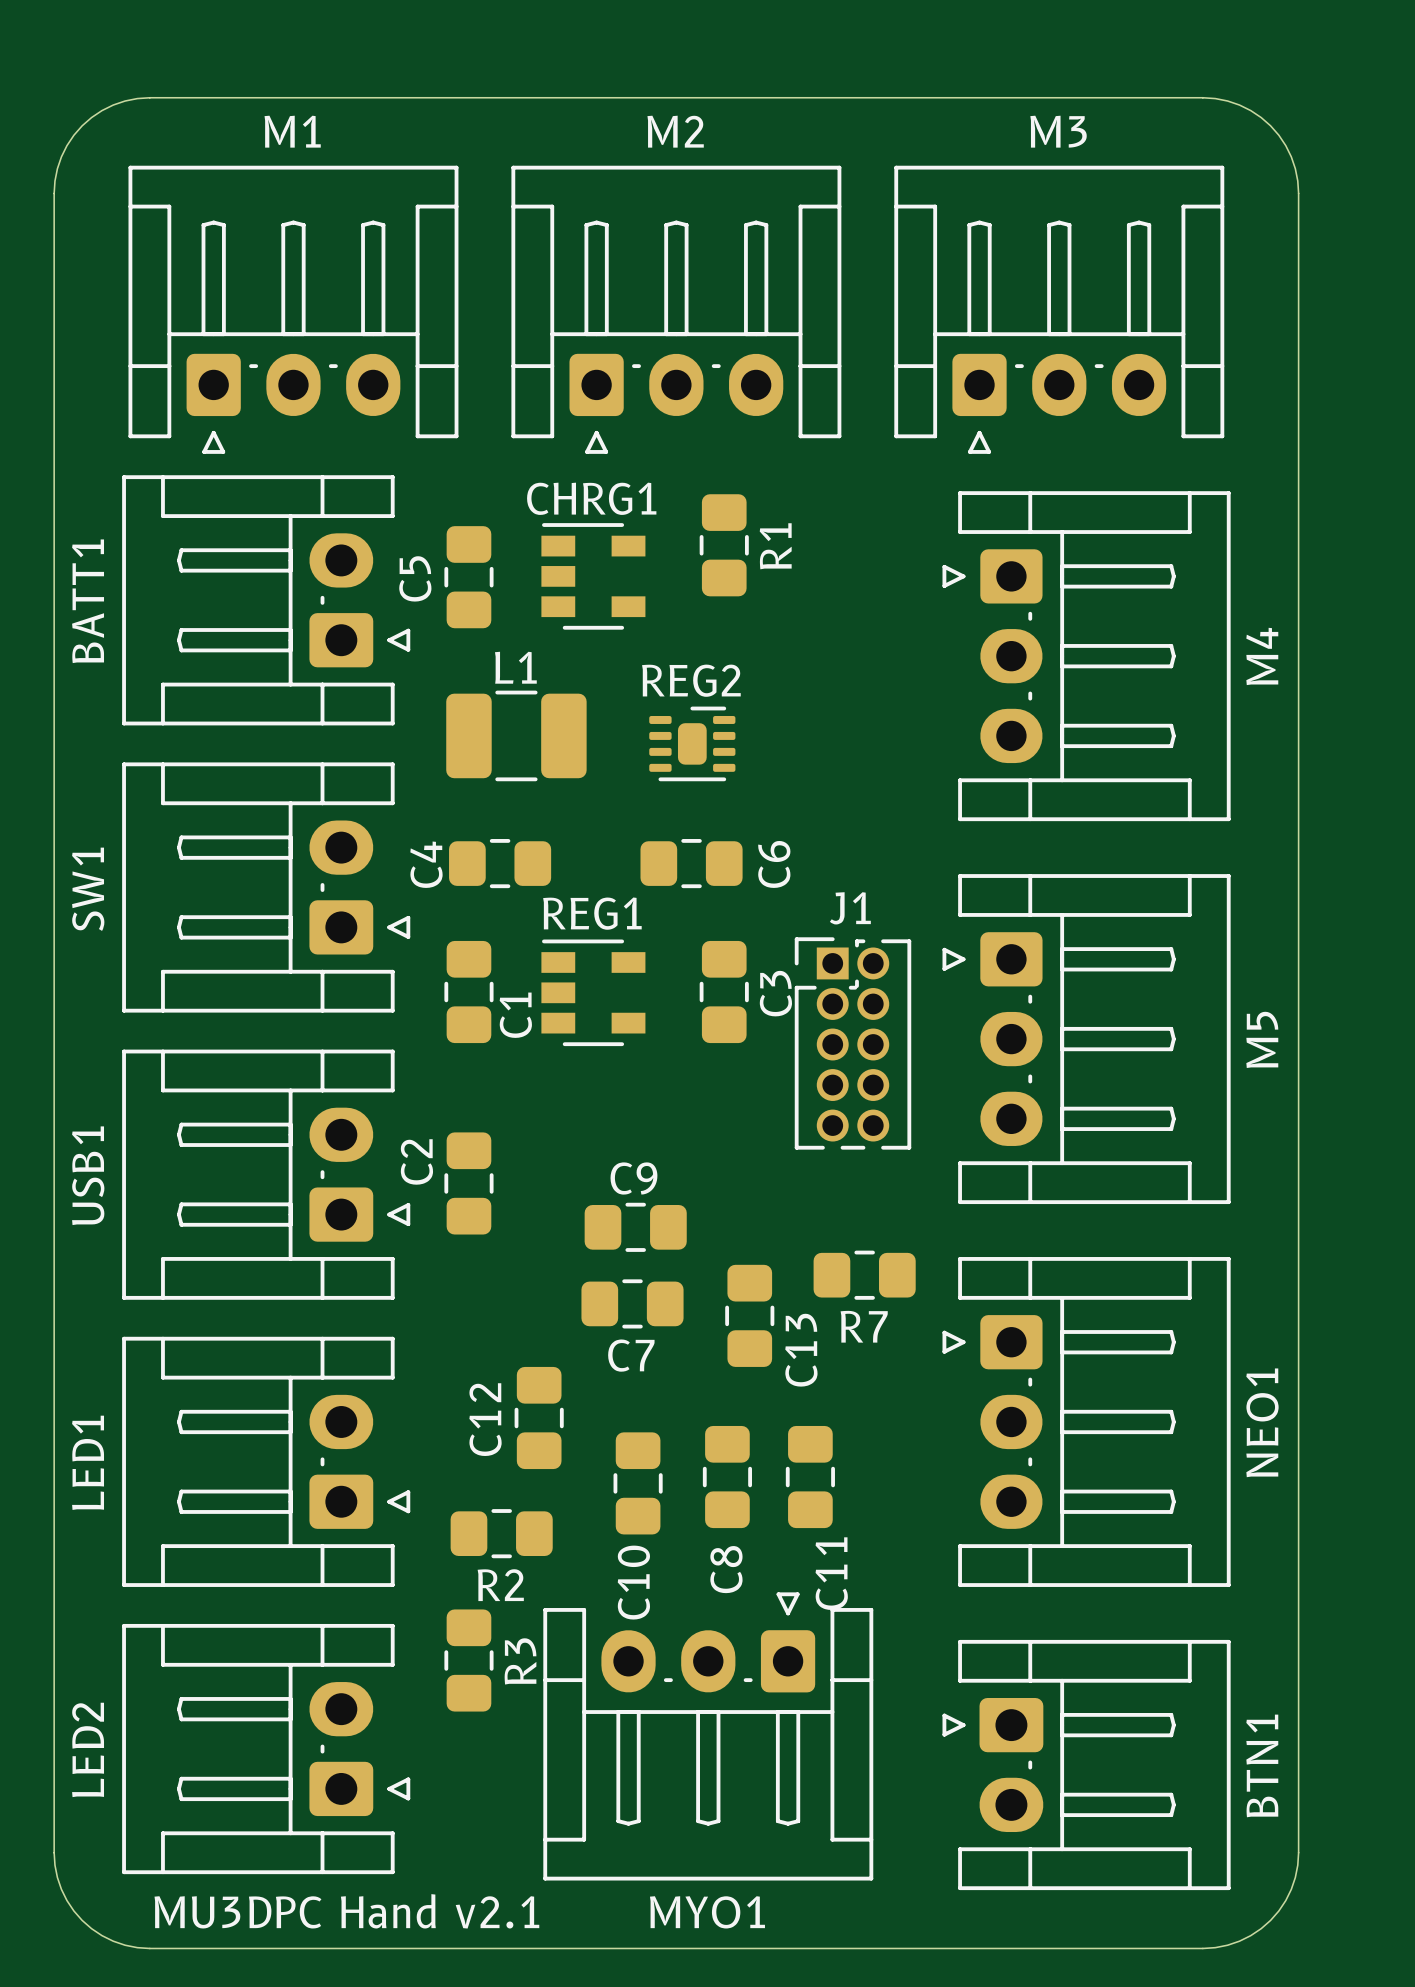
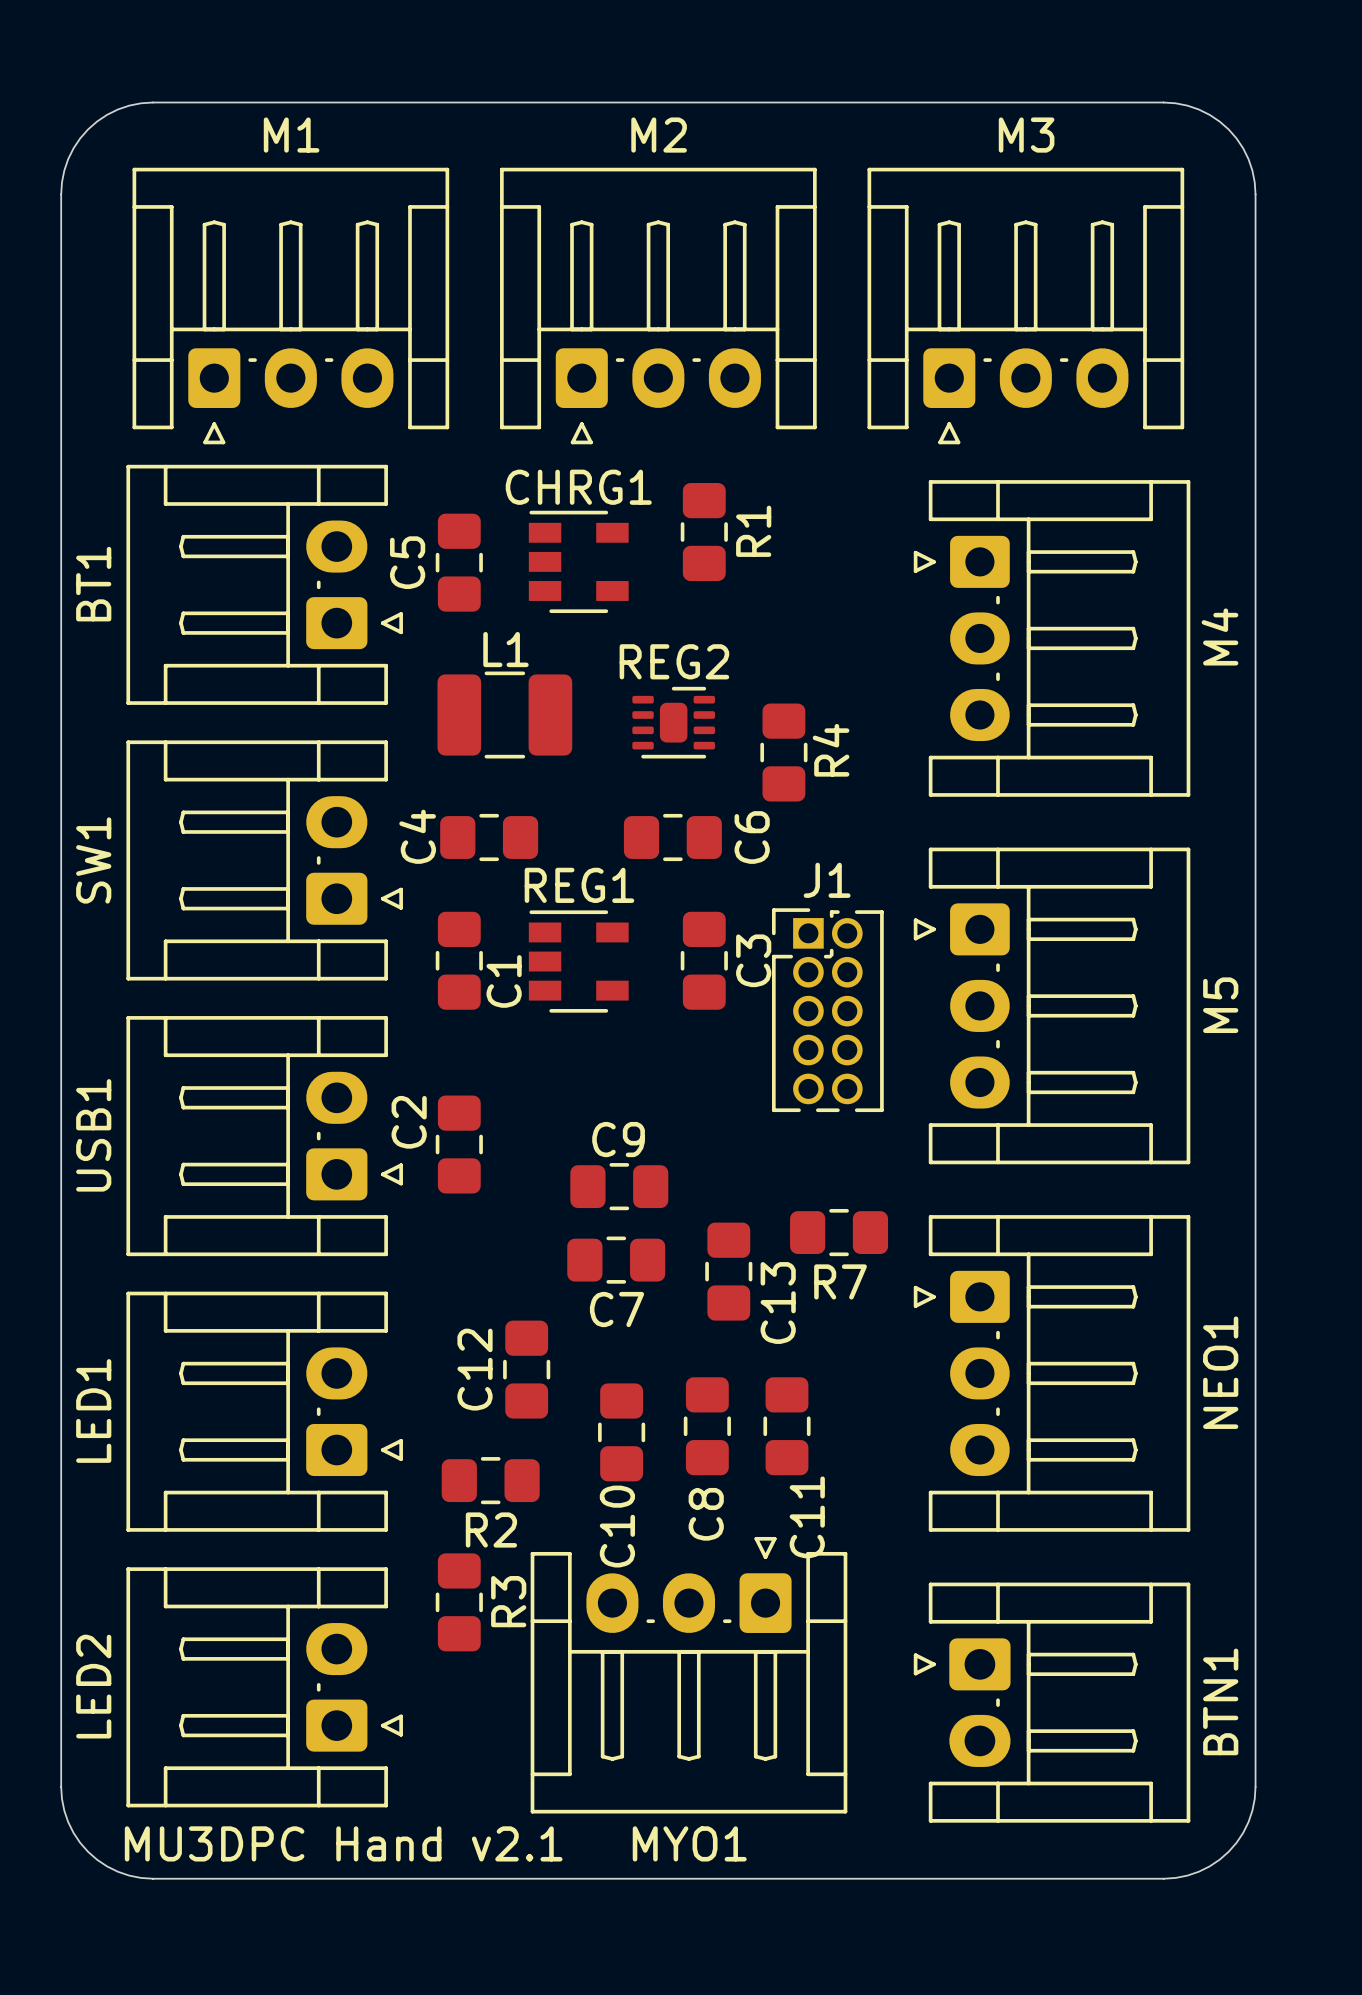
BATT1 name: BATT1 (88, 601) -> BT1 (93, 584)
R4: none -> (783, 752)

